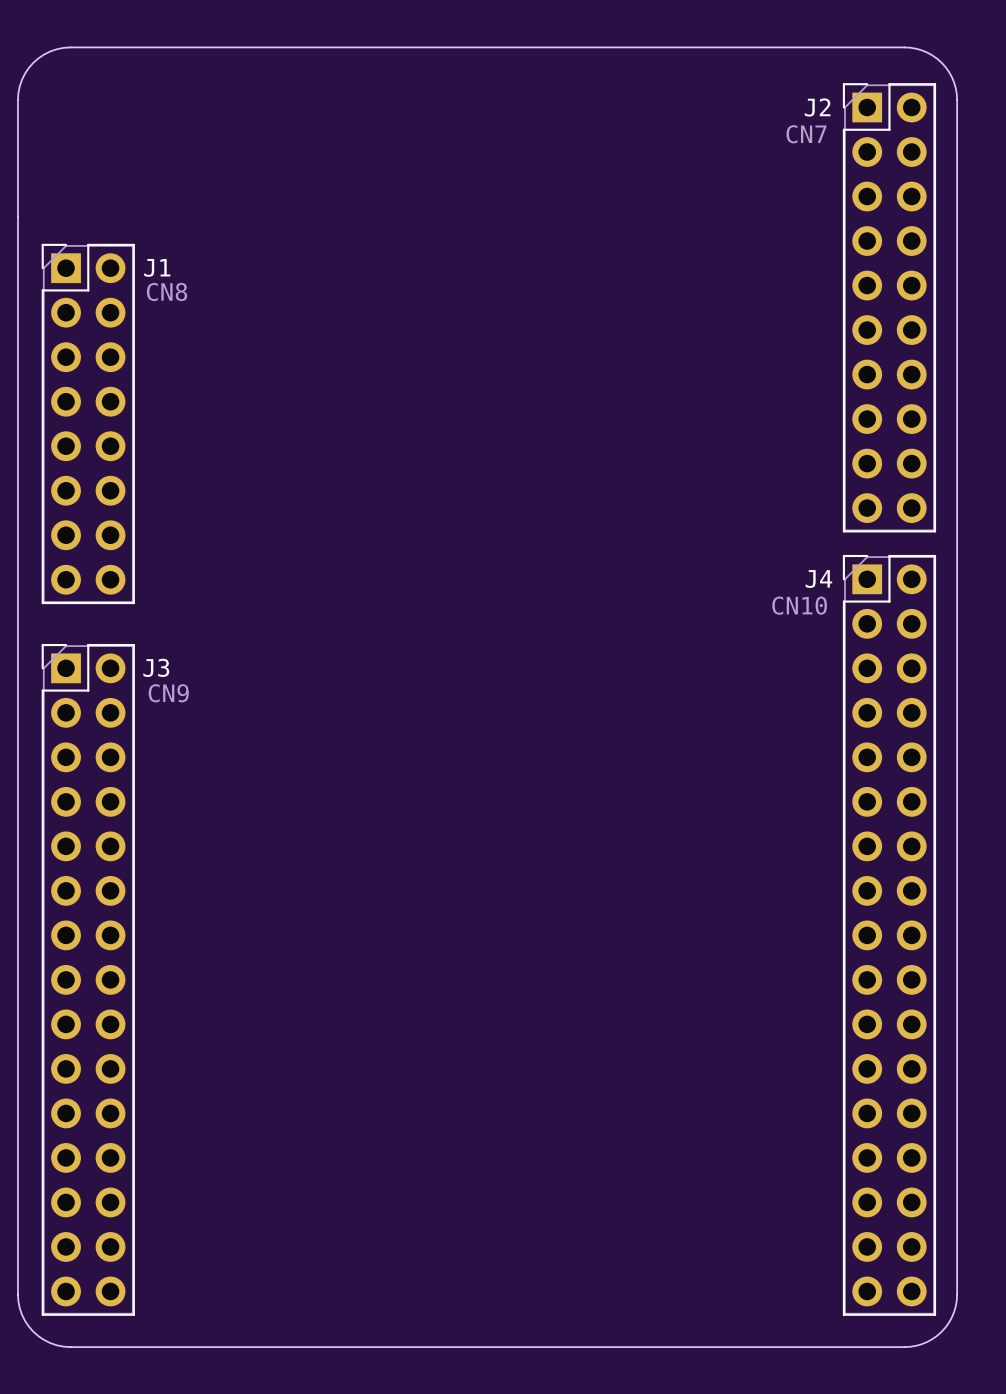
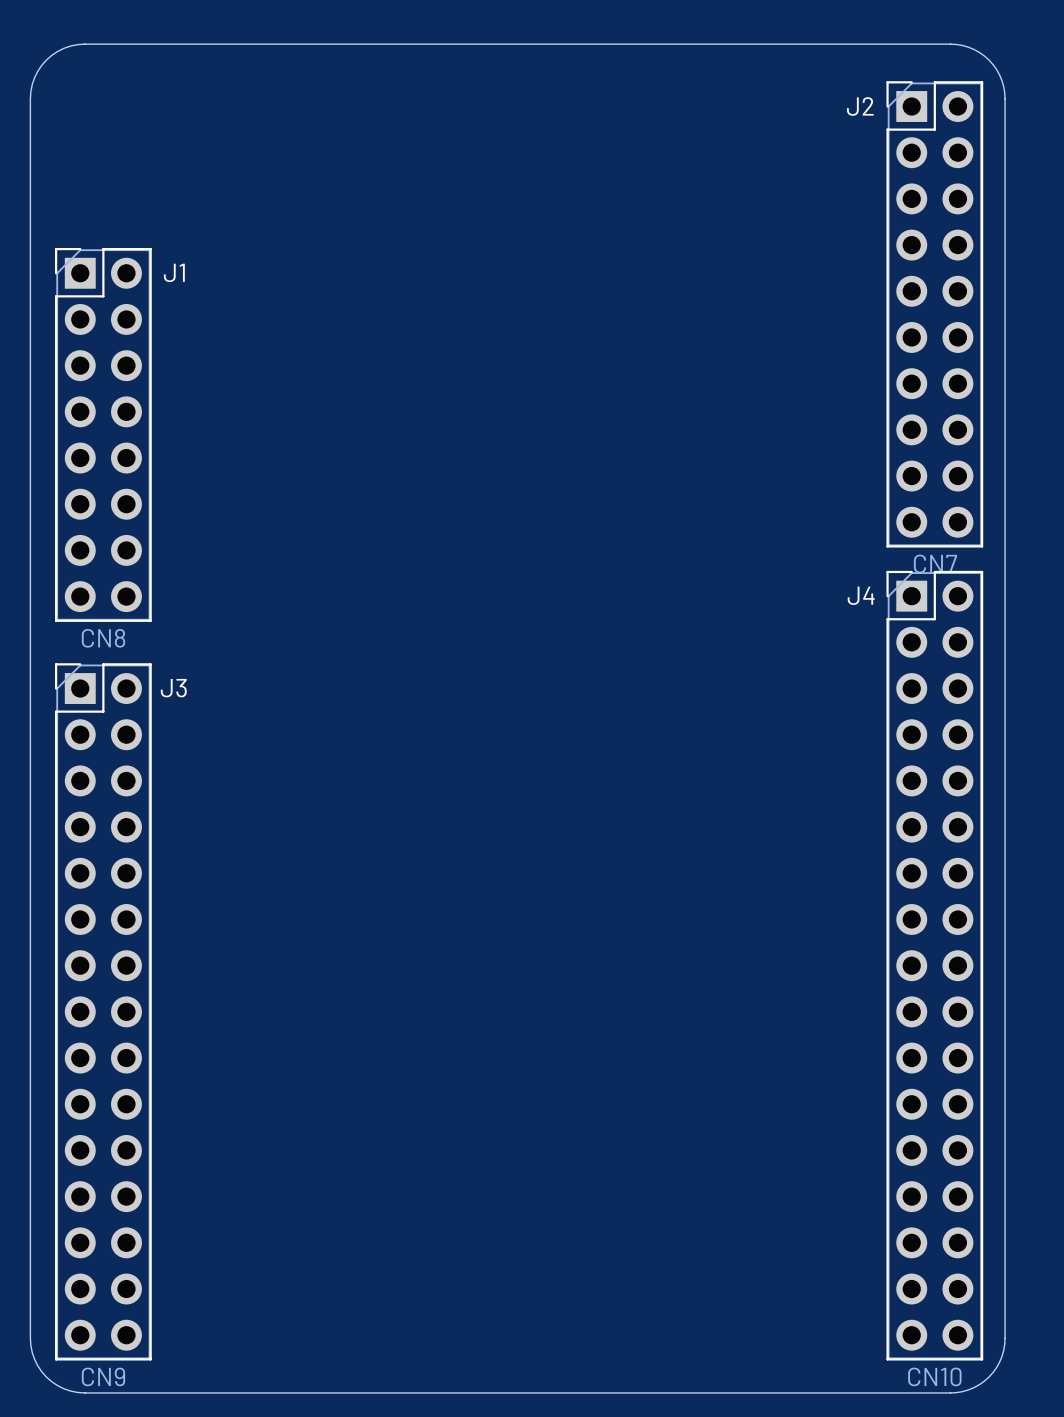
J2 value position: CN7 (806, 134) -> CN7 (935, 563)
J1 value position: CN8 (167, 291) -> CN8 (103, 638)
J4 value position: CN10 (799, 605) -> CN10 (934, 1376)
J3 value position: CN9 (168, 693) -> CN9 (103, 1376)

